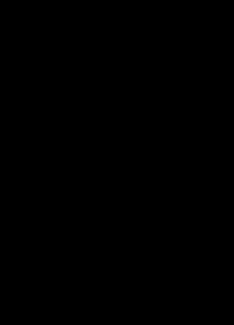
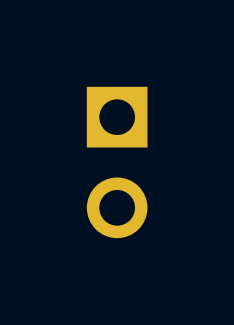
part: none -> (117, 162)

